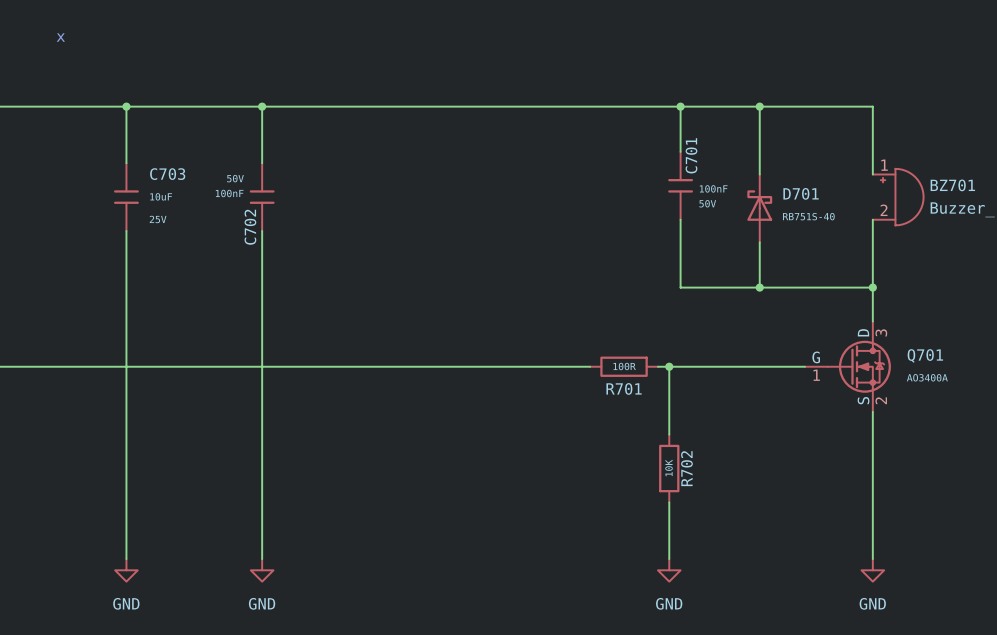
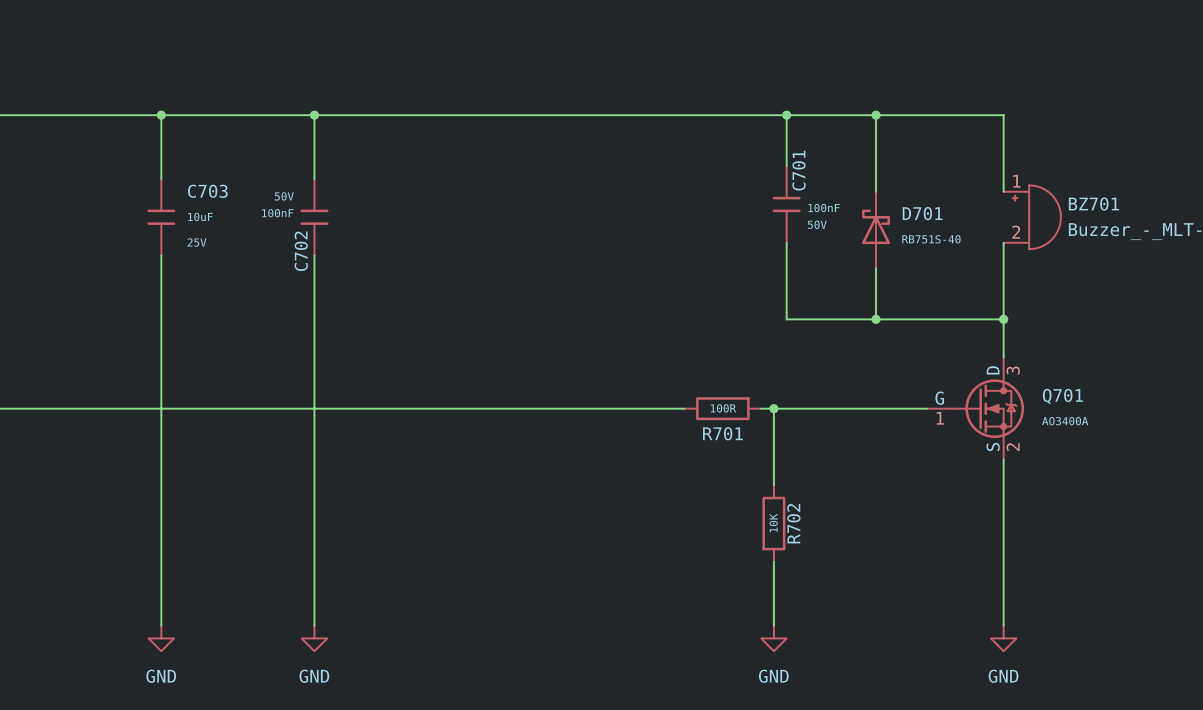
text: x (60, 37) -> none

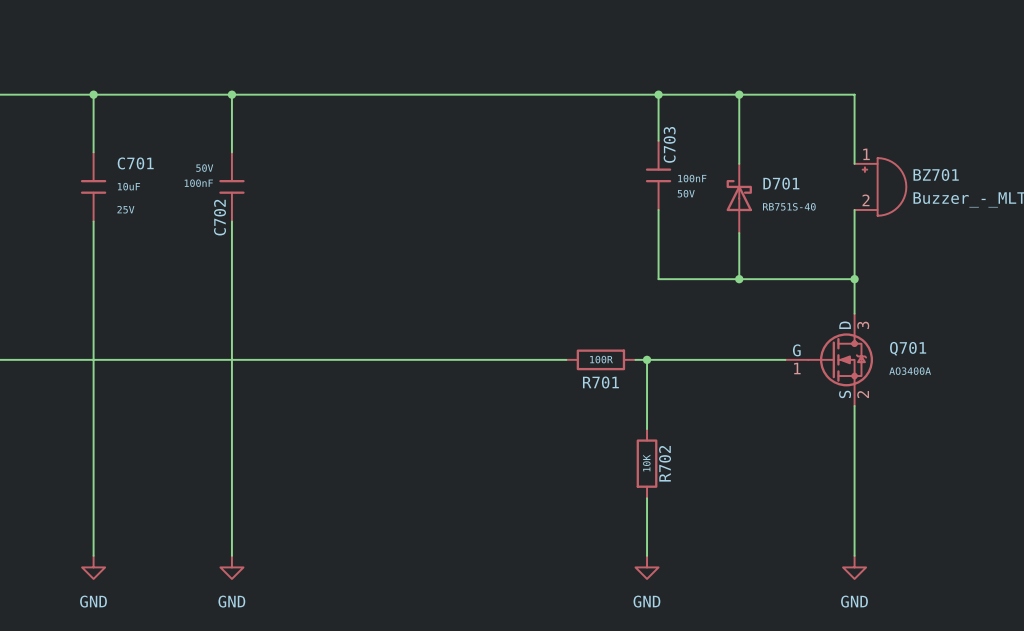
C701 name: C701 (798, 170) -> C703 (669, 144)
C703 name: C703 (207, 191) -> C701 (135, 163)

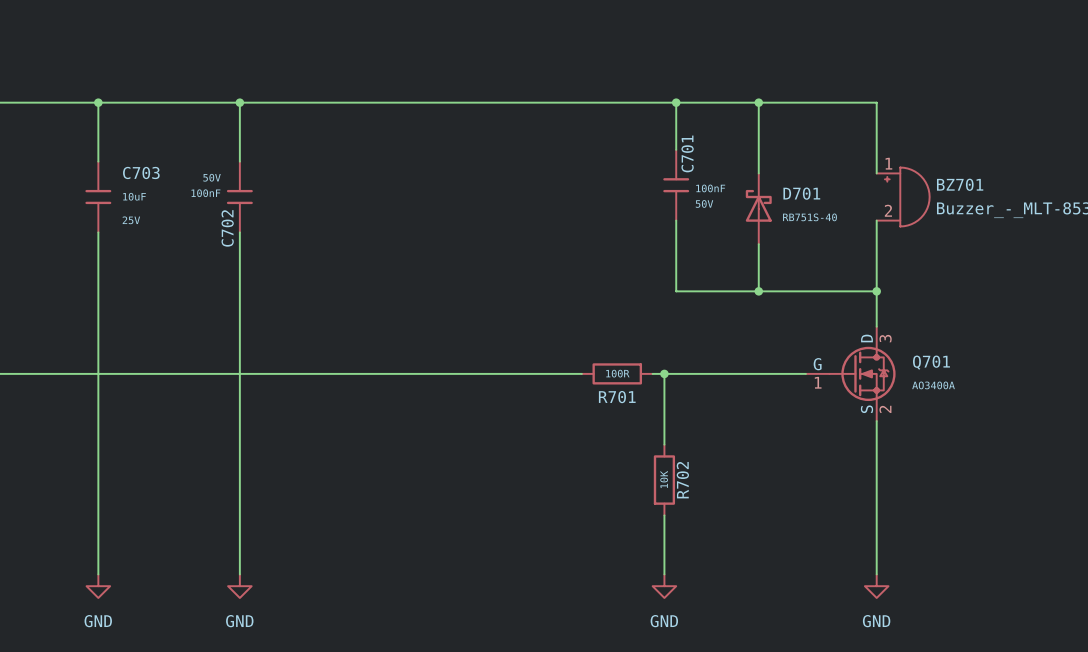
C703 name: C703 (669, 144) -> C701 (687, 153)
C701 name: C701 (135, 163) -> C703 (141, 172)

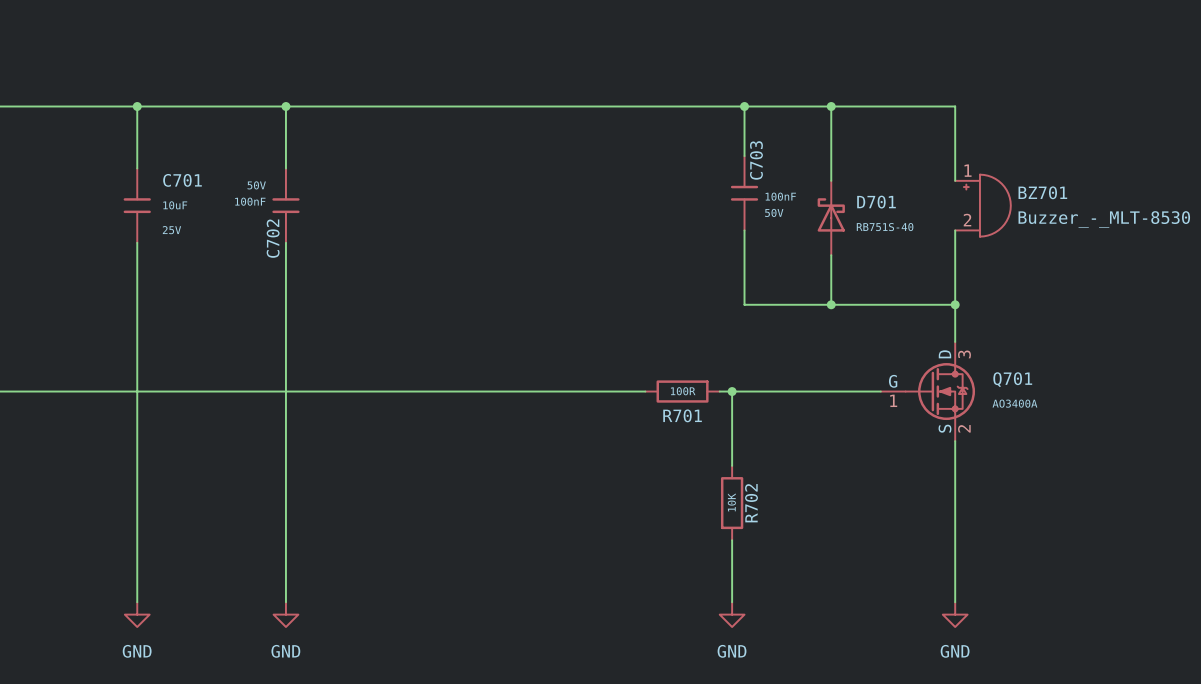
C701 name: C701 (687, 153) -> C703 (756, 160)
C703 name: C703 (141, 172) -> C701 (182, 180)

